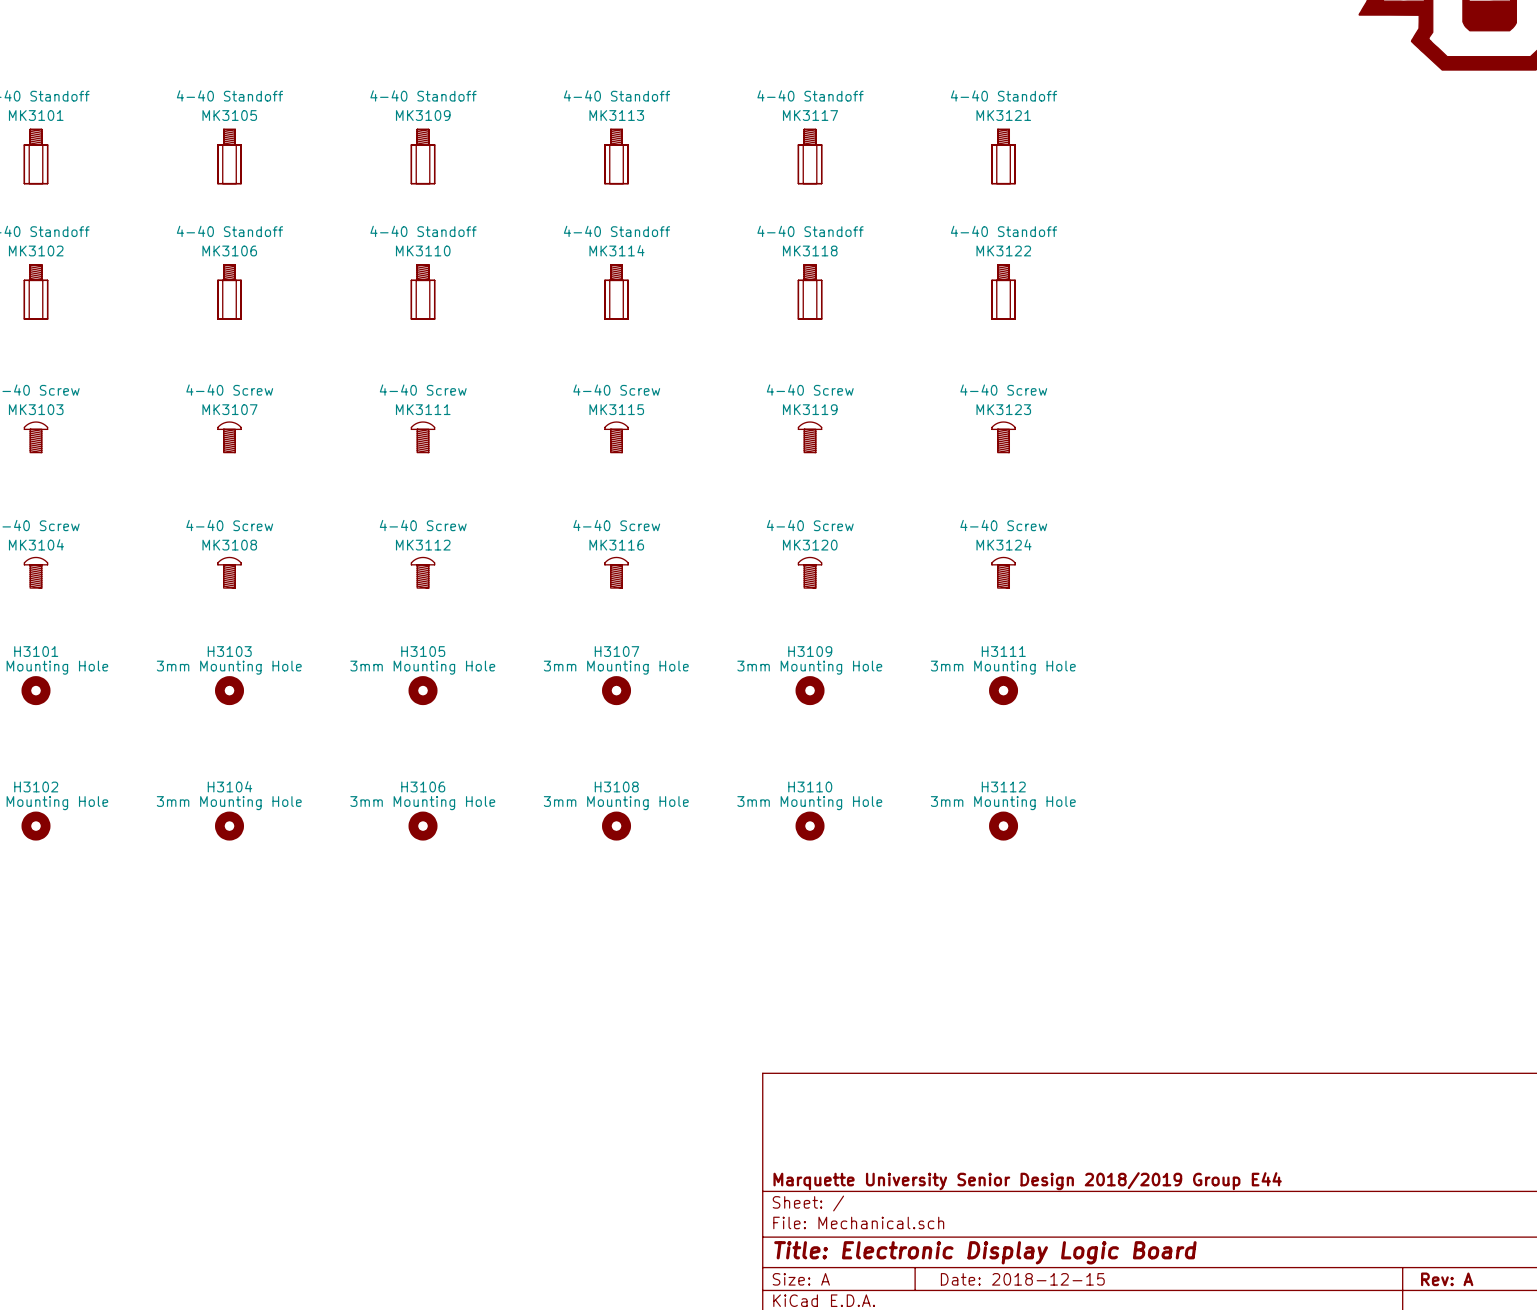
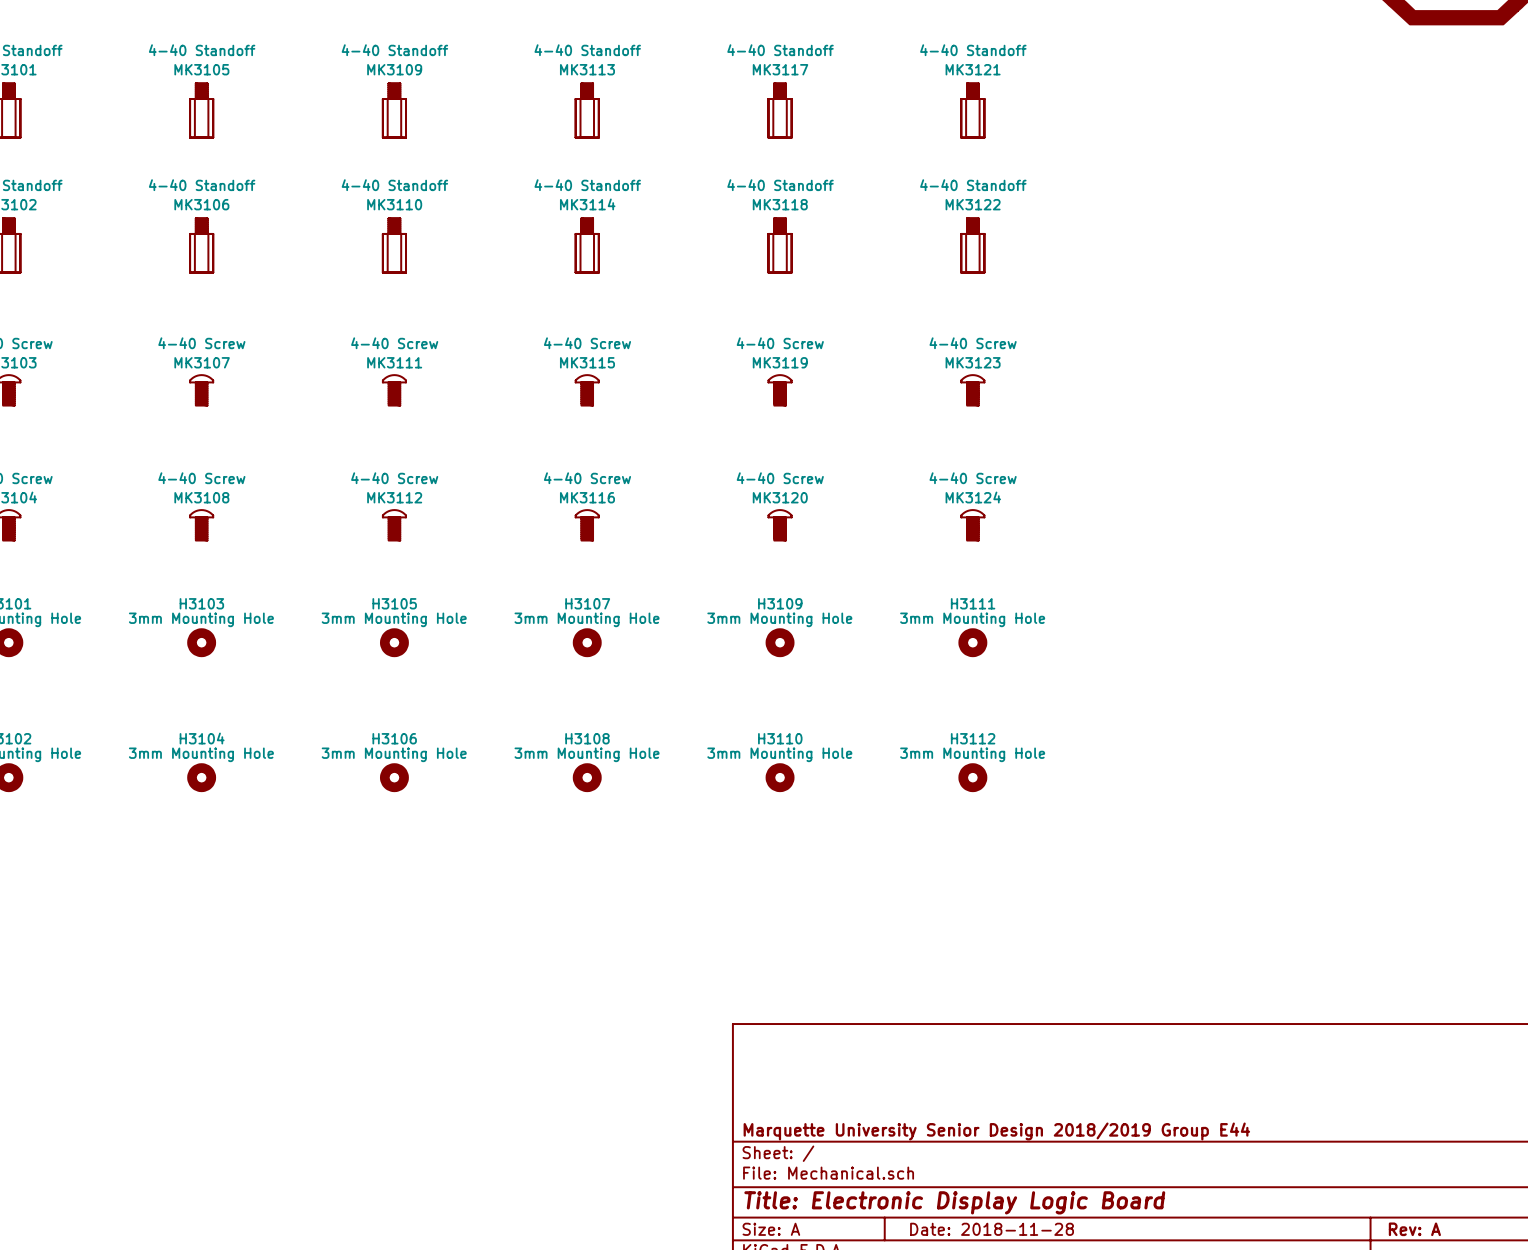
title block: Date: 2018-12-15 (1022, 1279) -> Date: 2018-11-28 (992, 1229)

